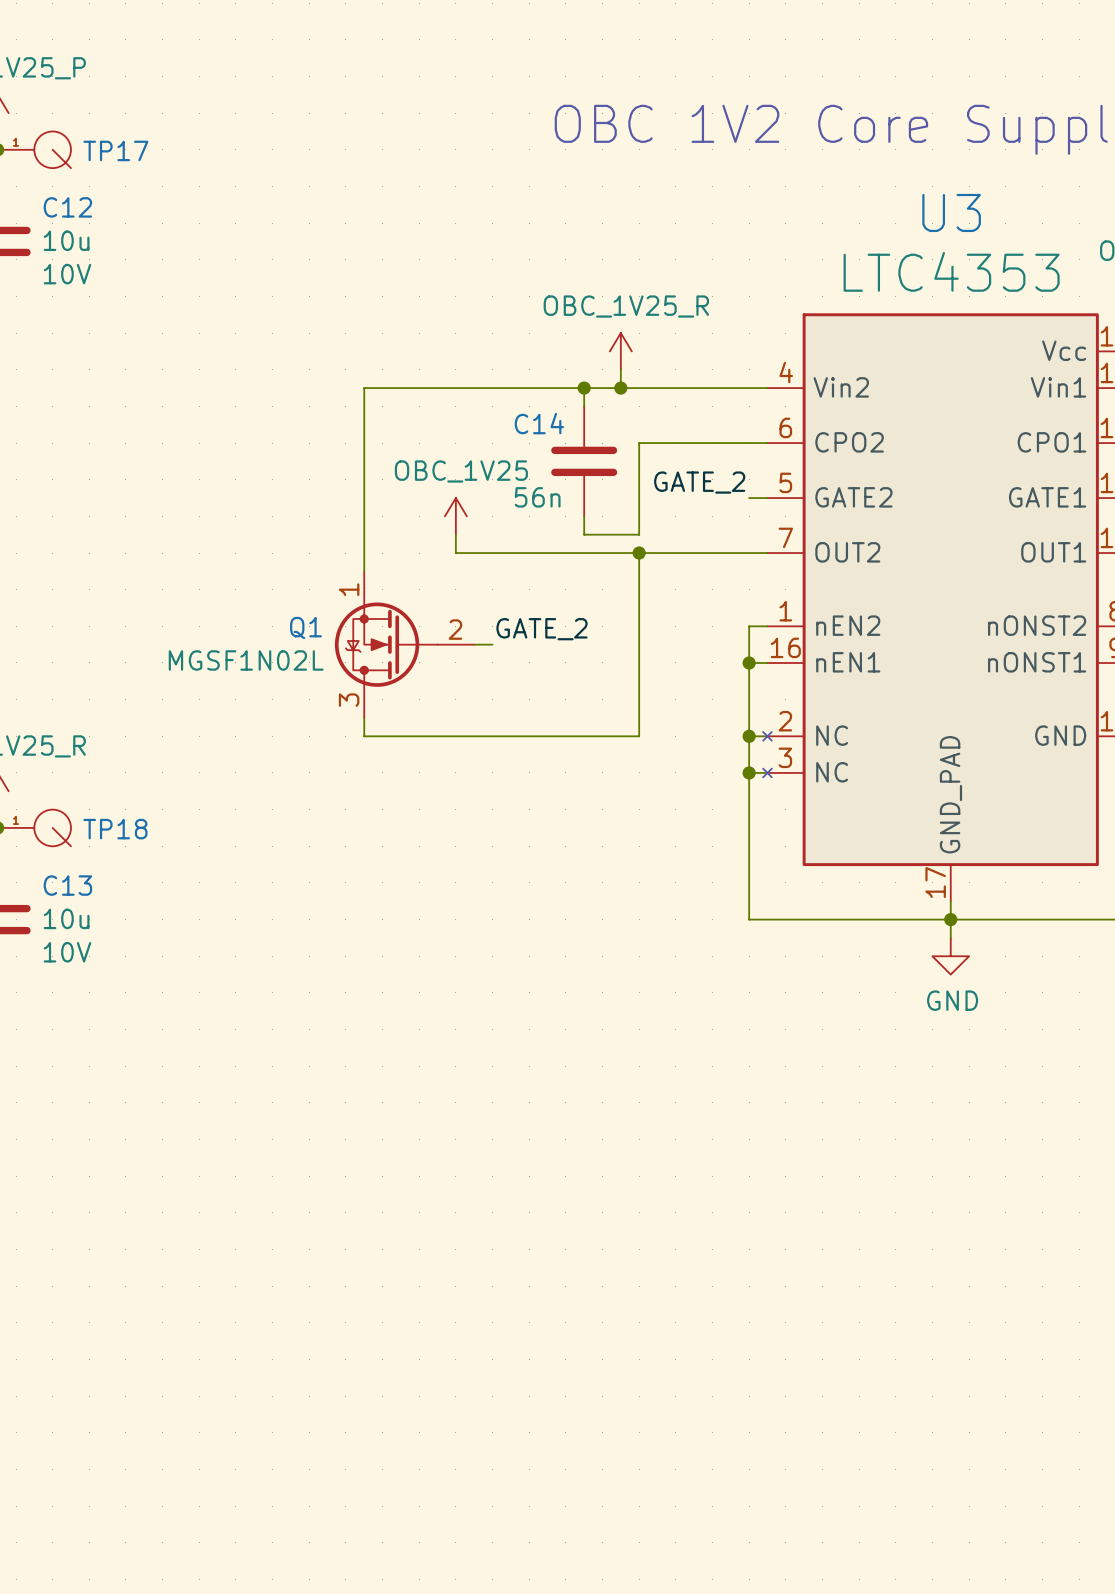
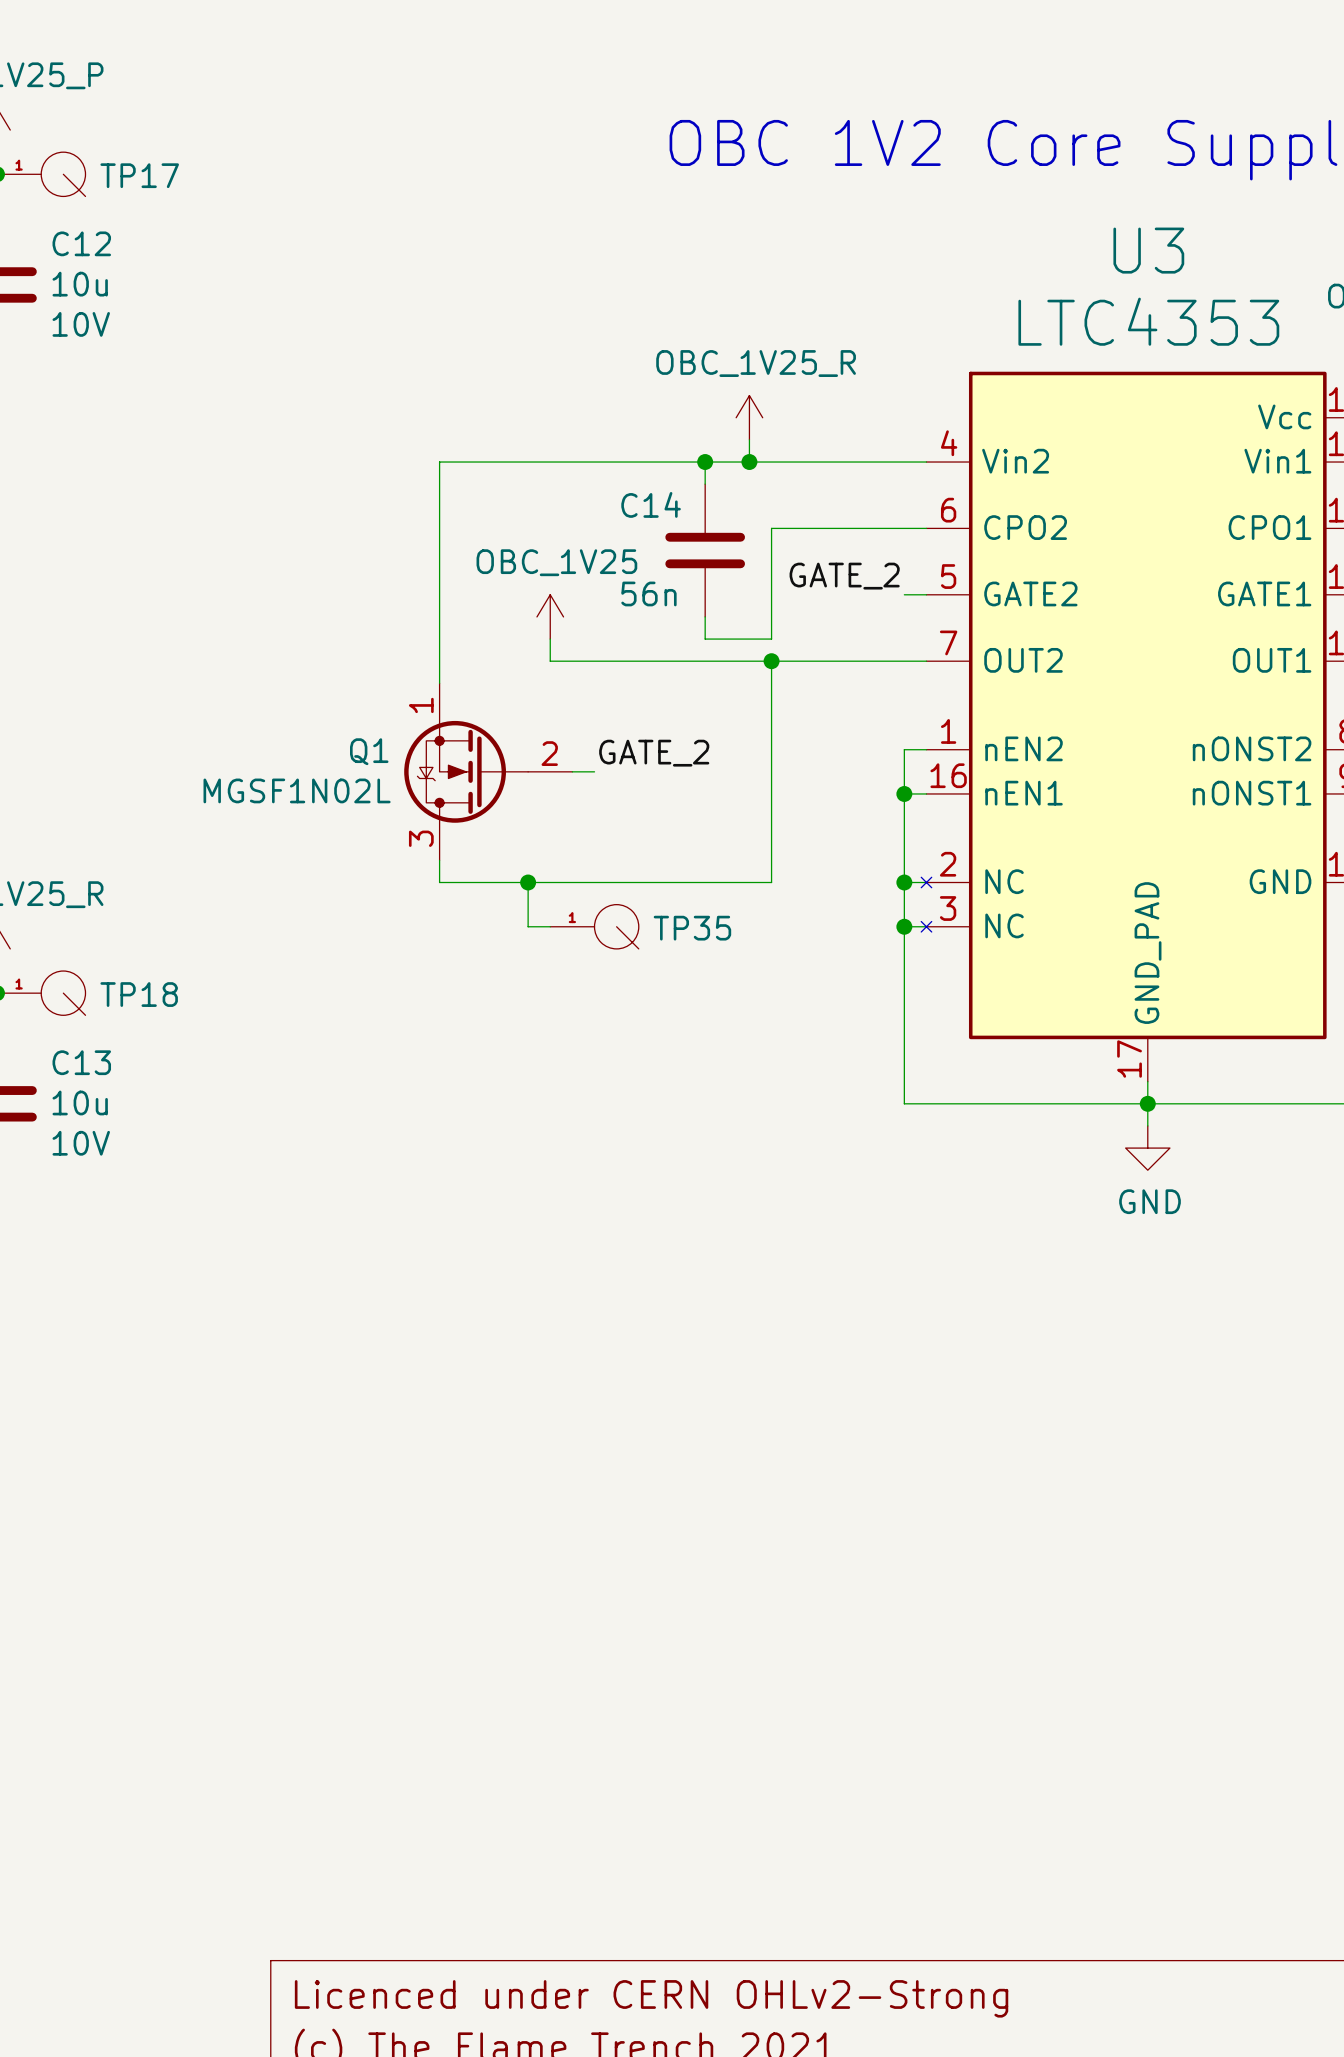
wire: none -> (528, 882) (528, 926) (550, 926)
junction: none -> (528, 882)
TP35: none -> (594, 926)

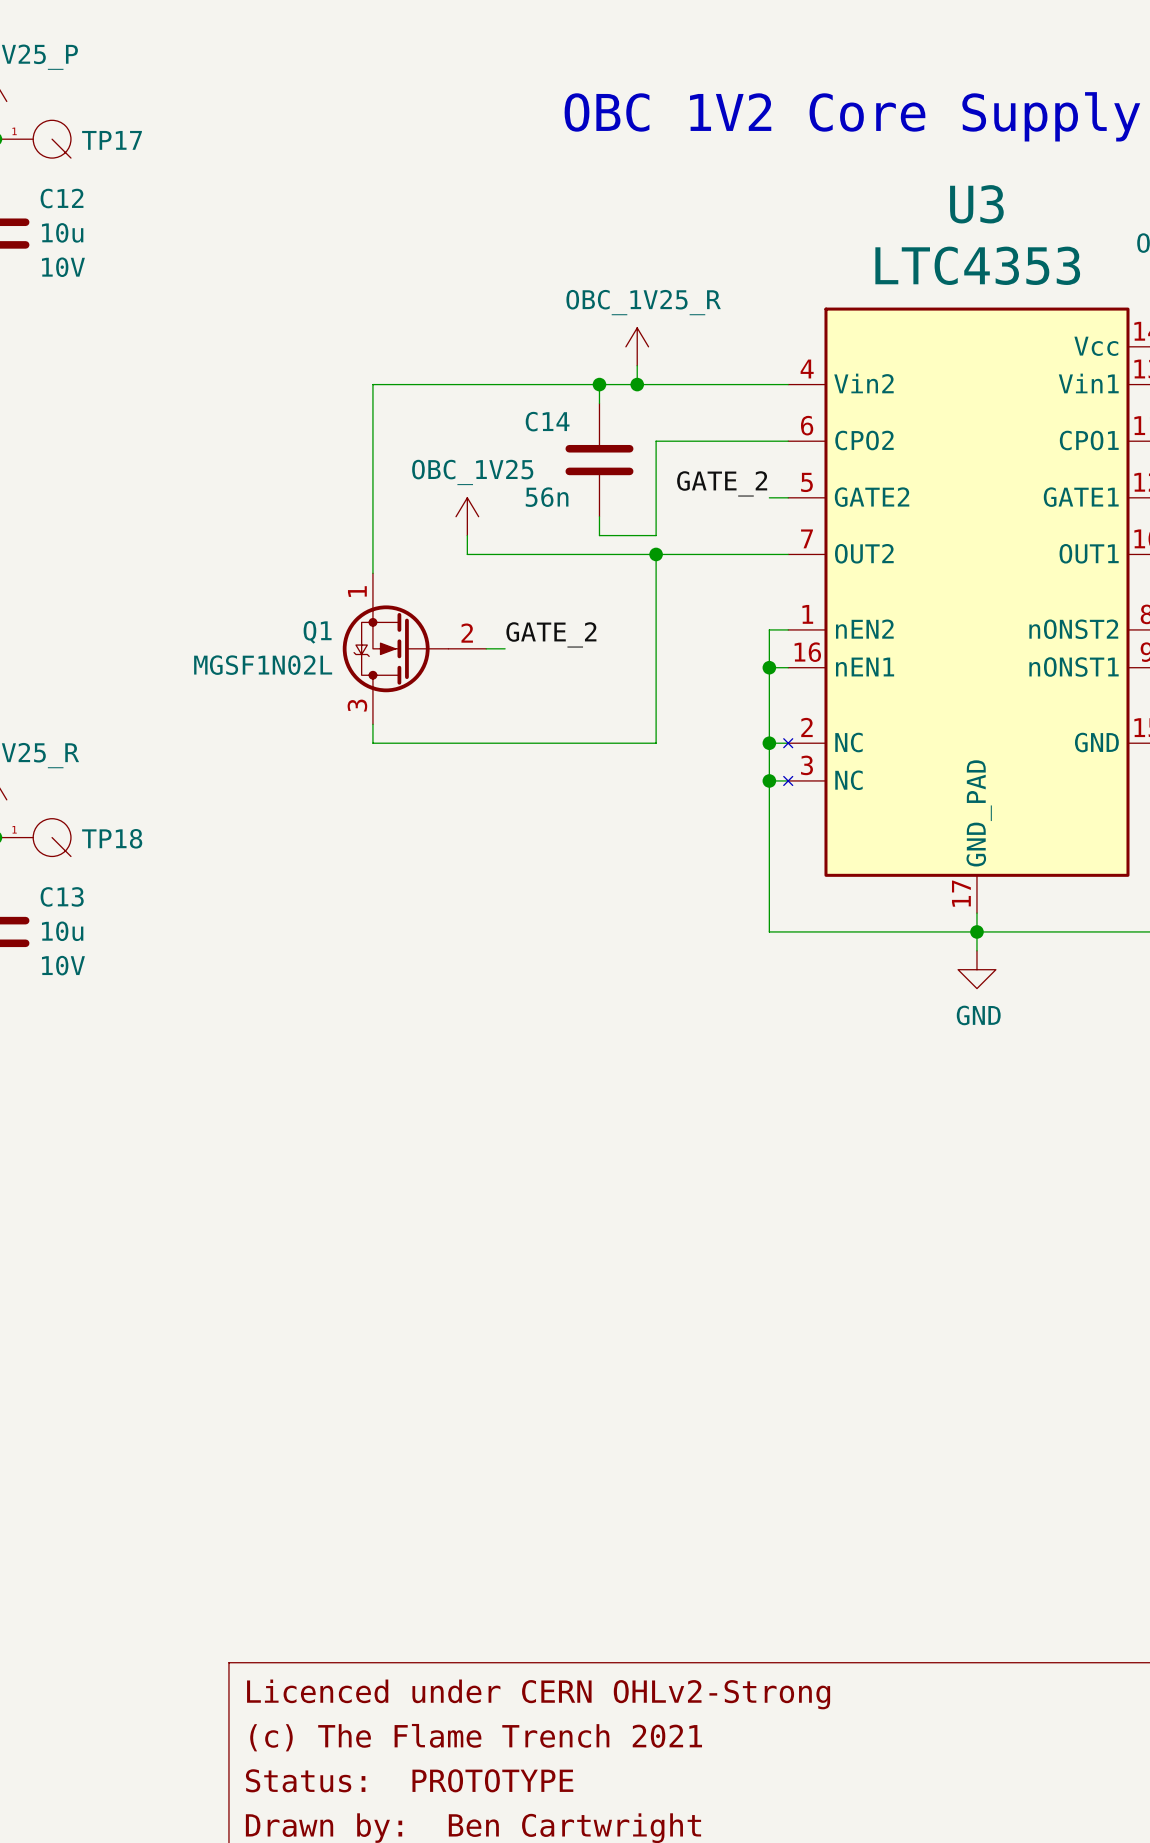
wire: (528, 882) (528, 926) (550, 926) -> none
junction: (528, 882) -> none
TP35: (594, 926) -> none

